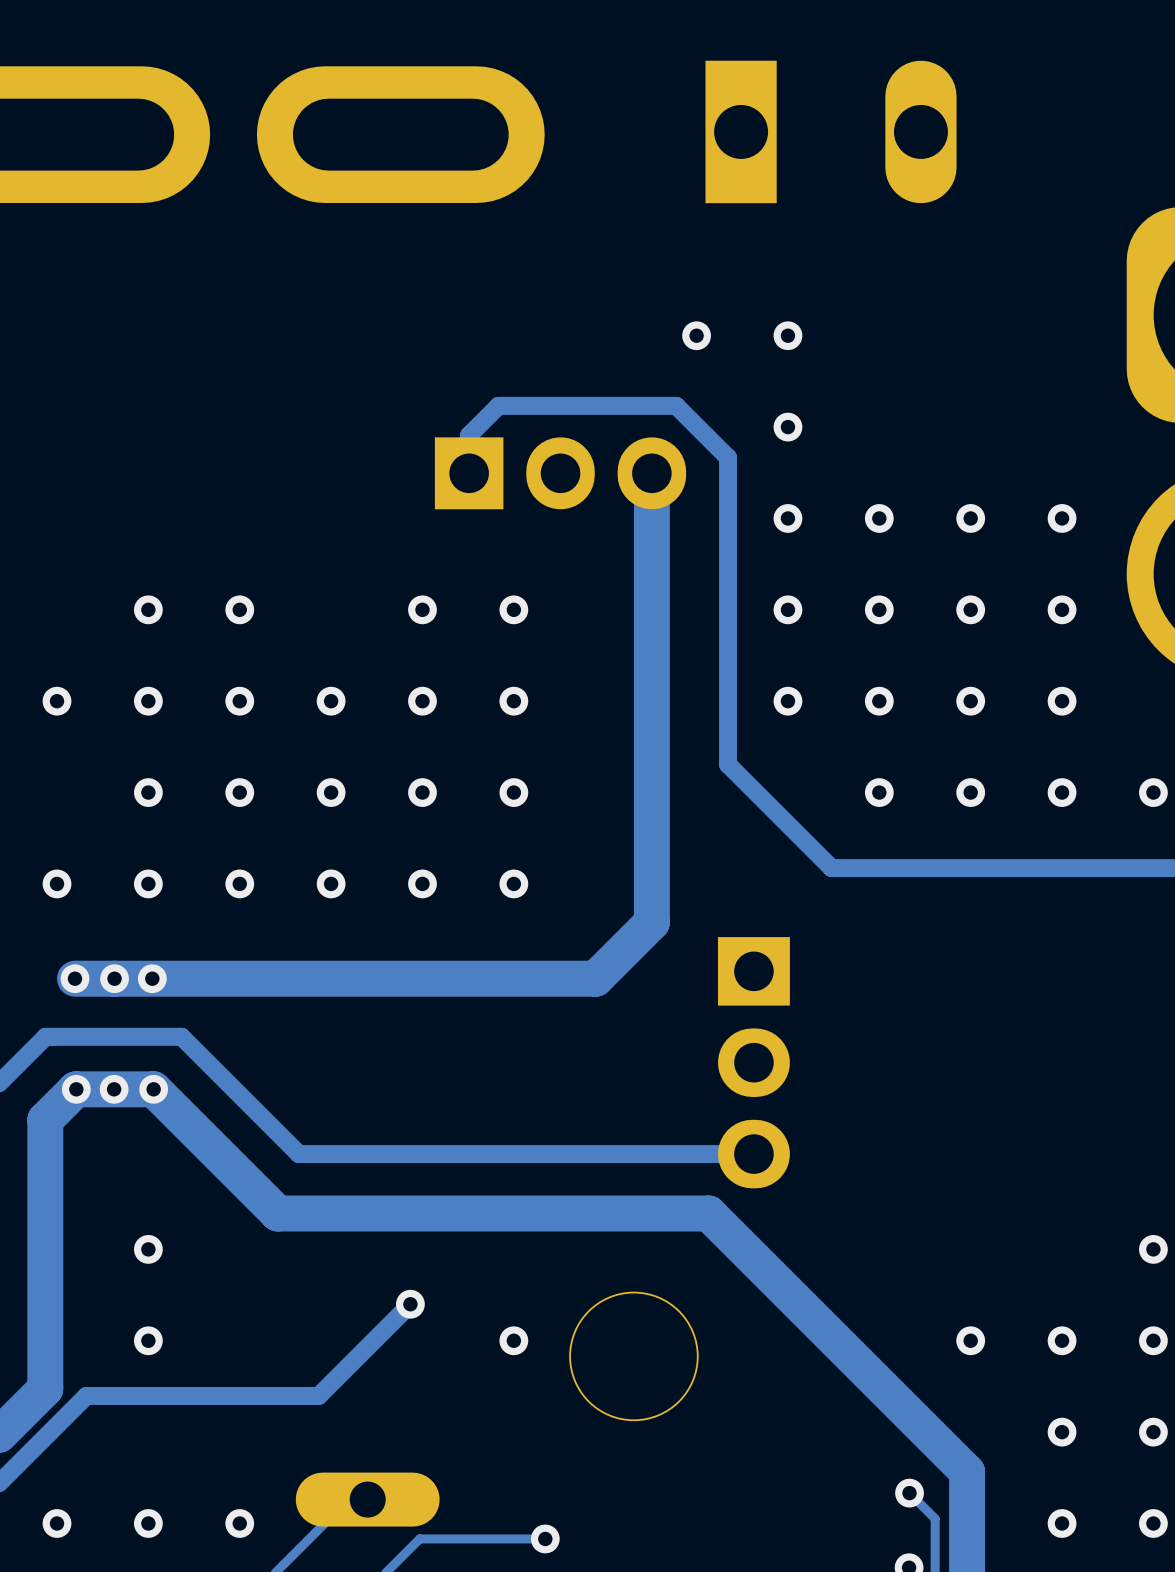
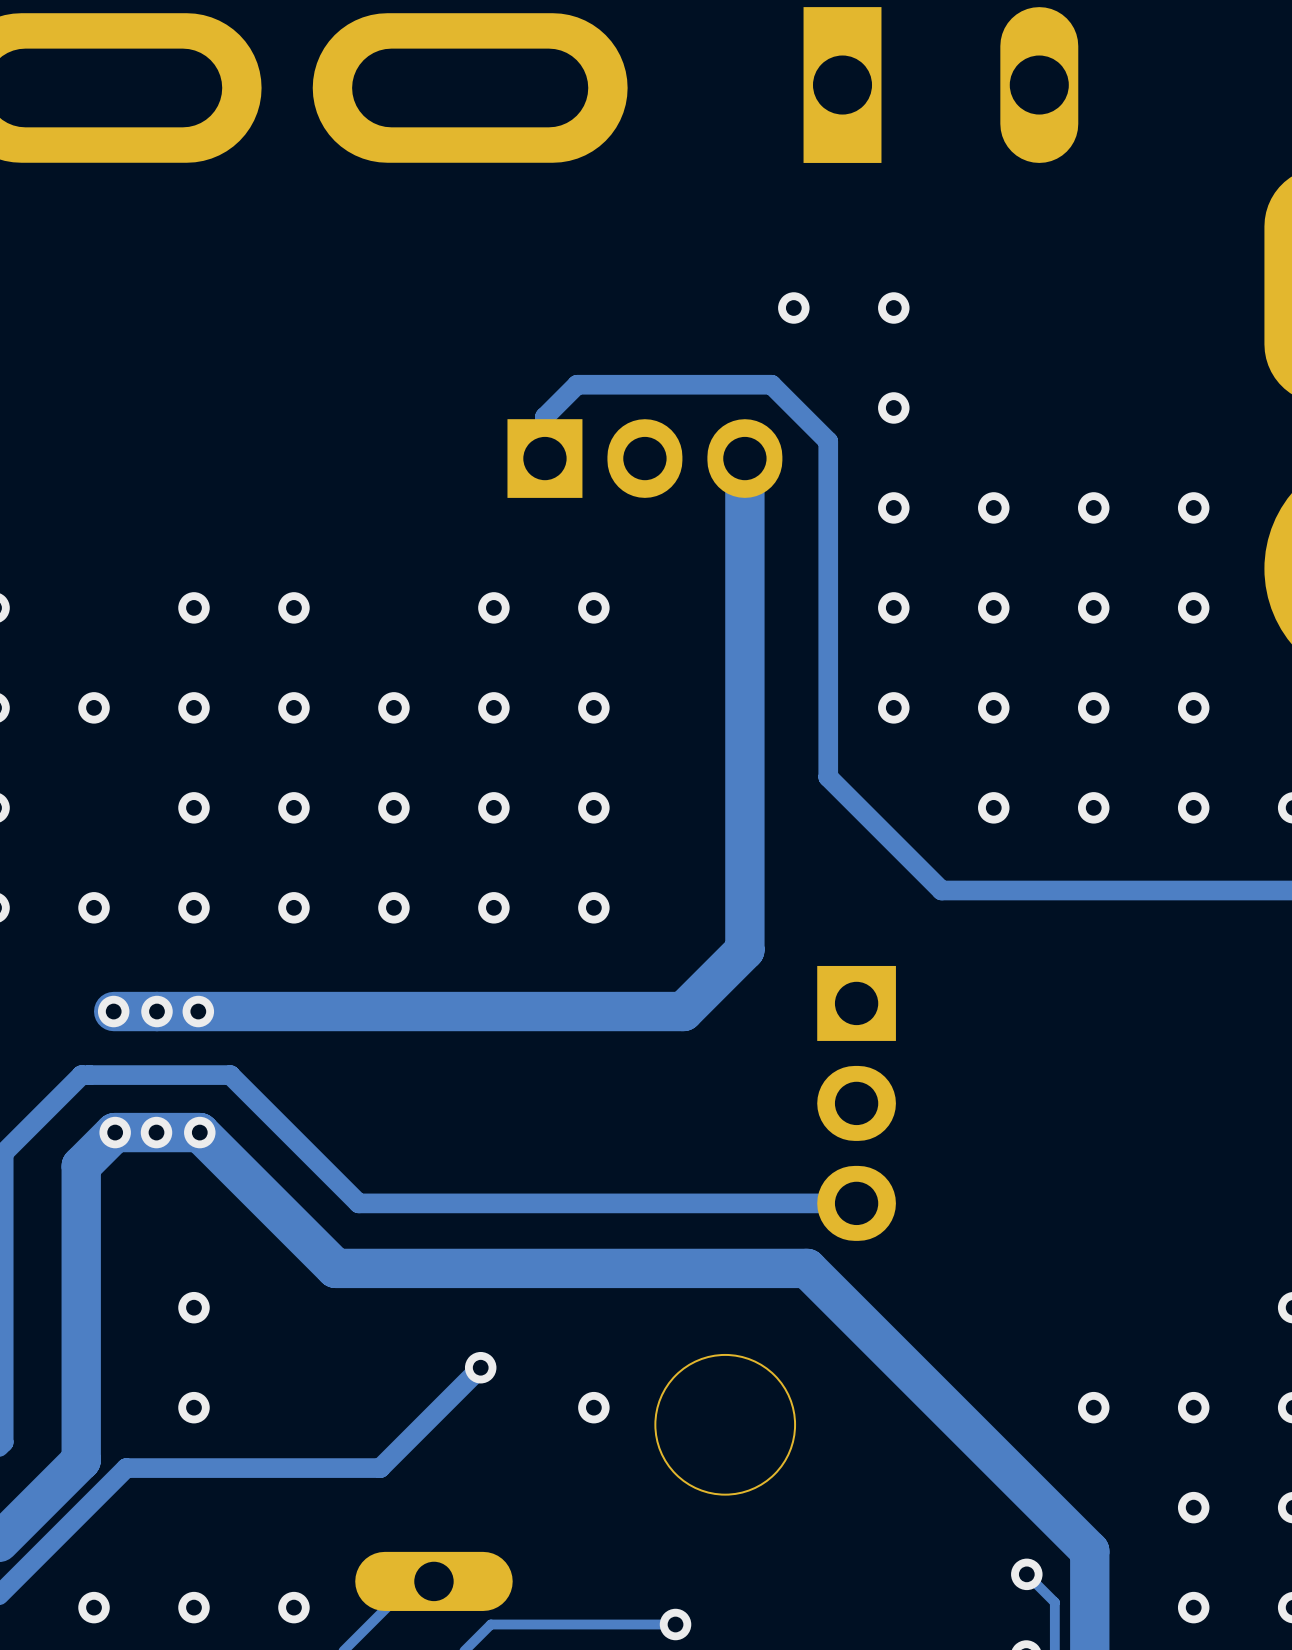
via position: (545, 1538) -> (675, 1624)
track: none -> (675, 1624) (628, 1624)

